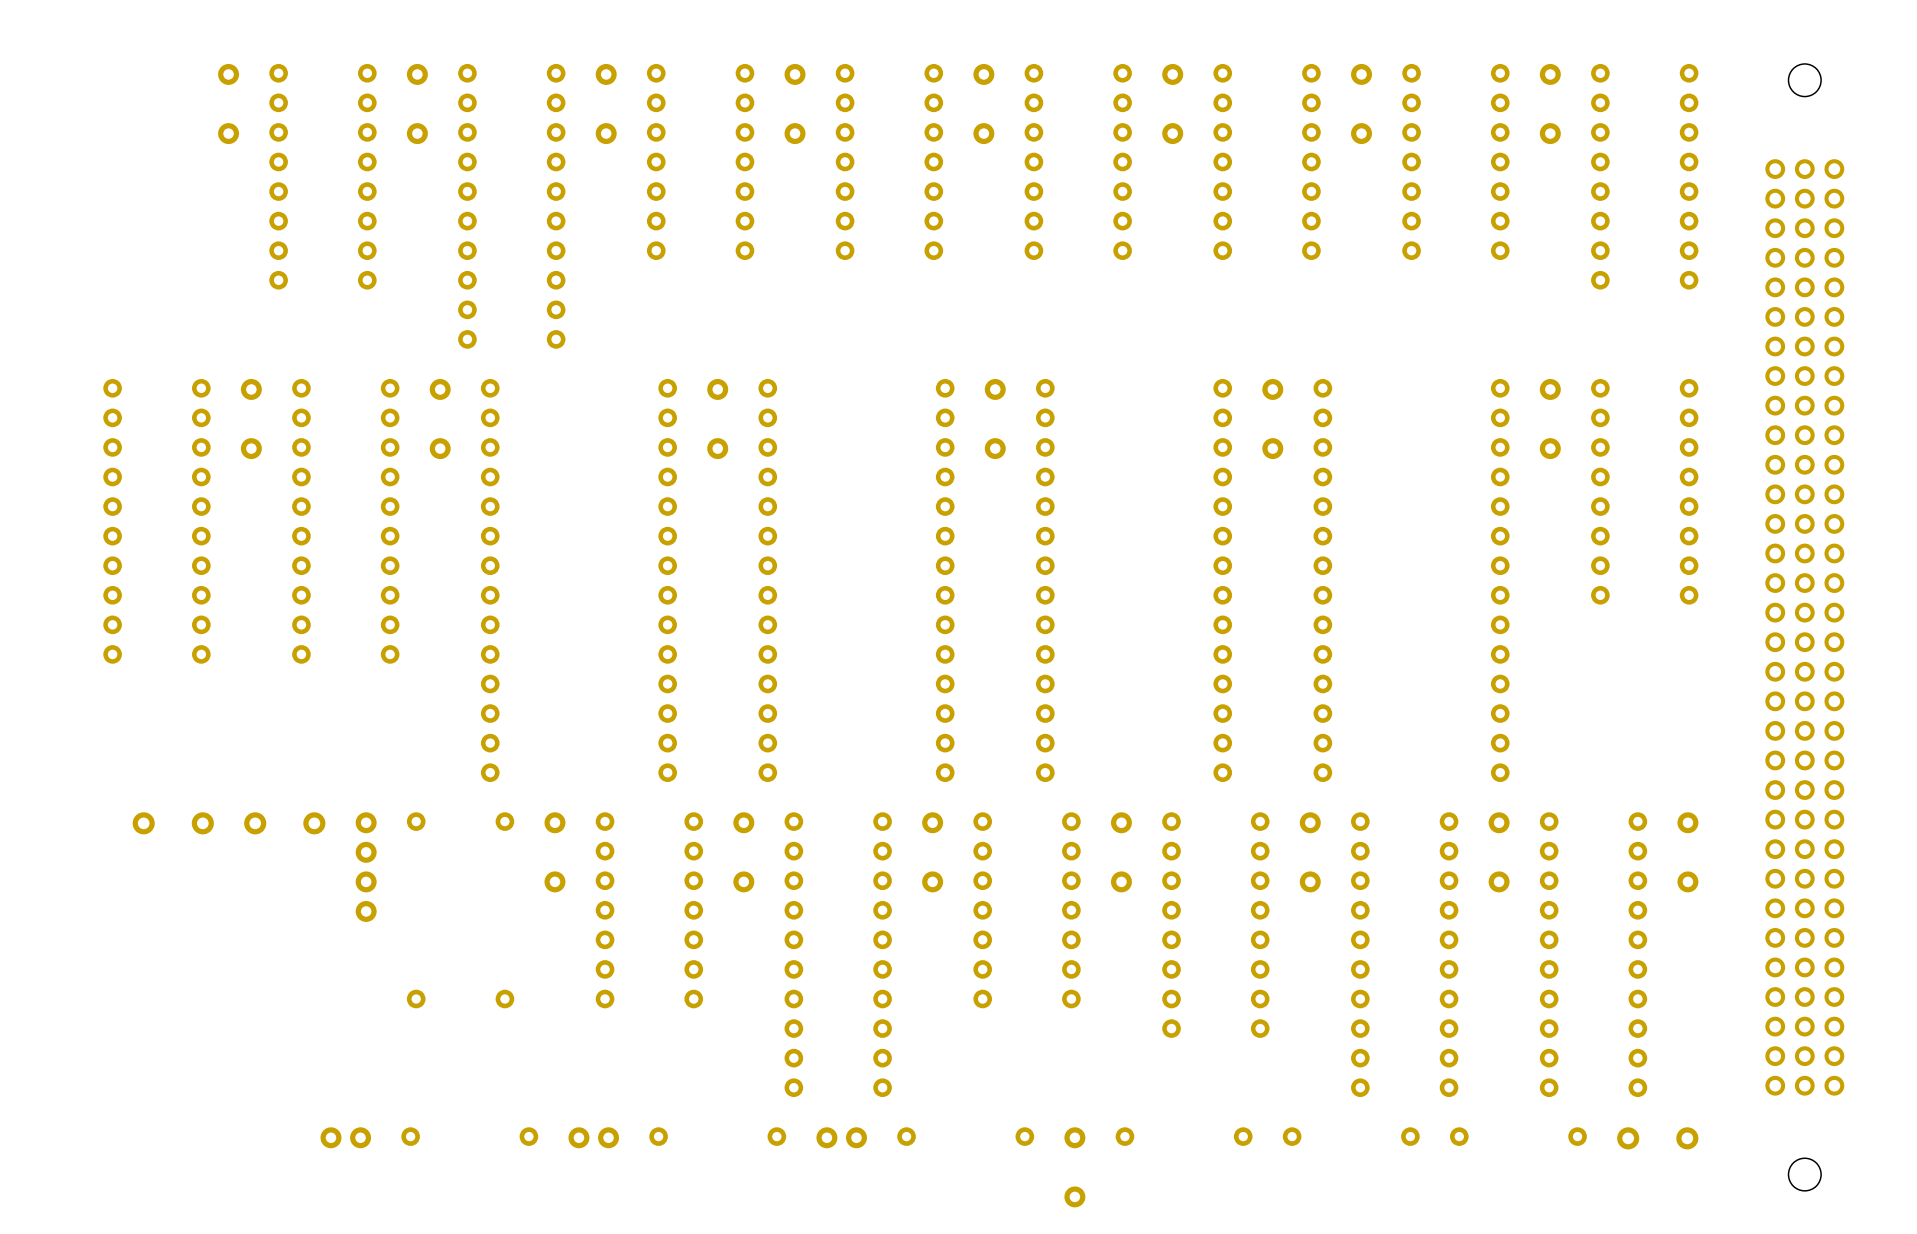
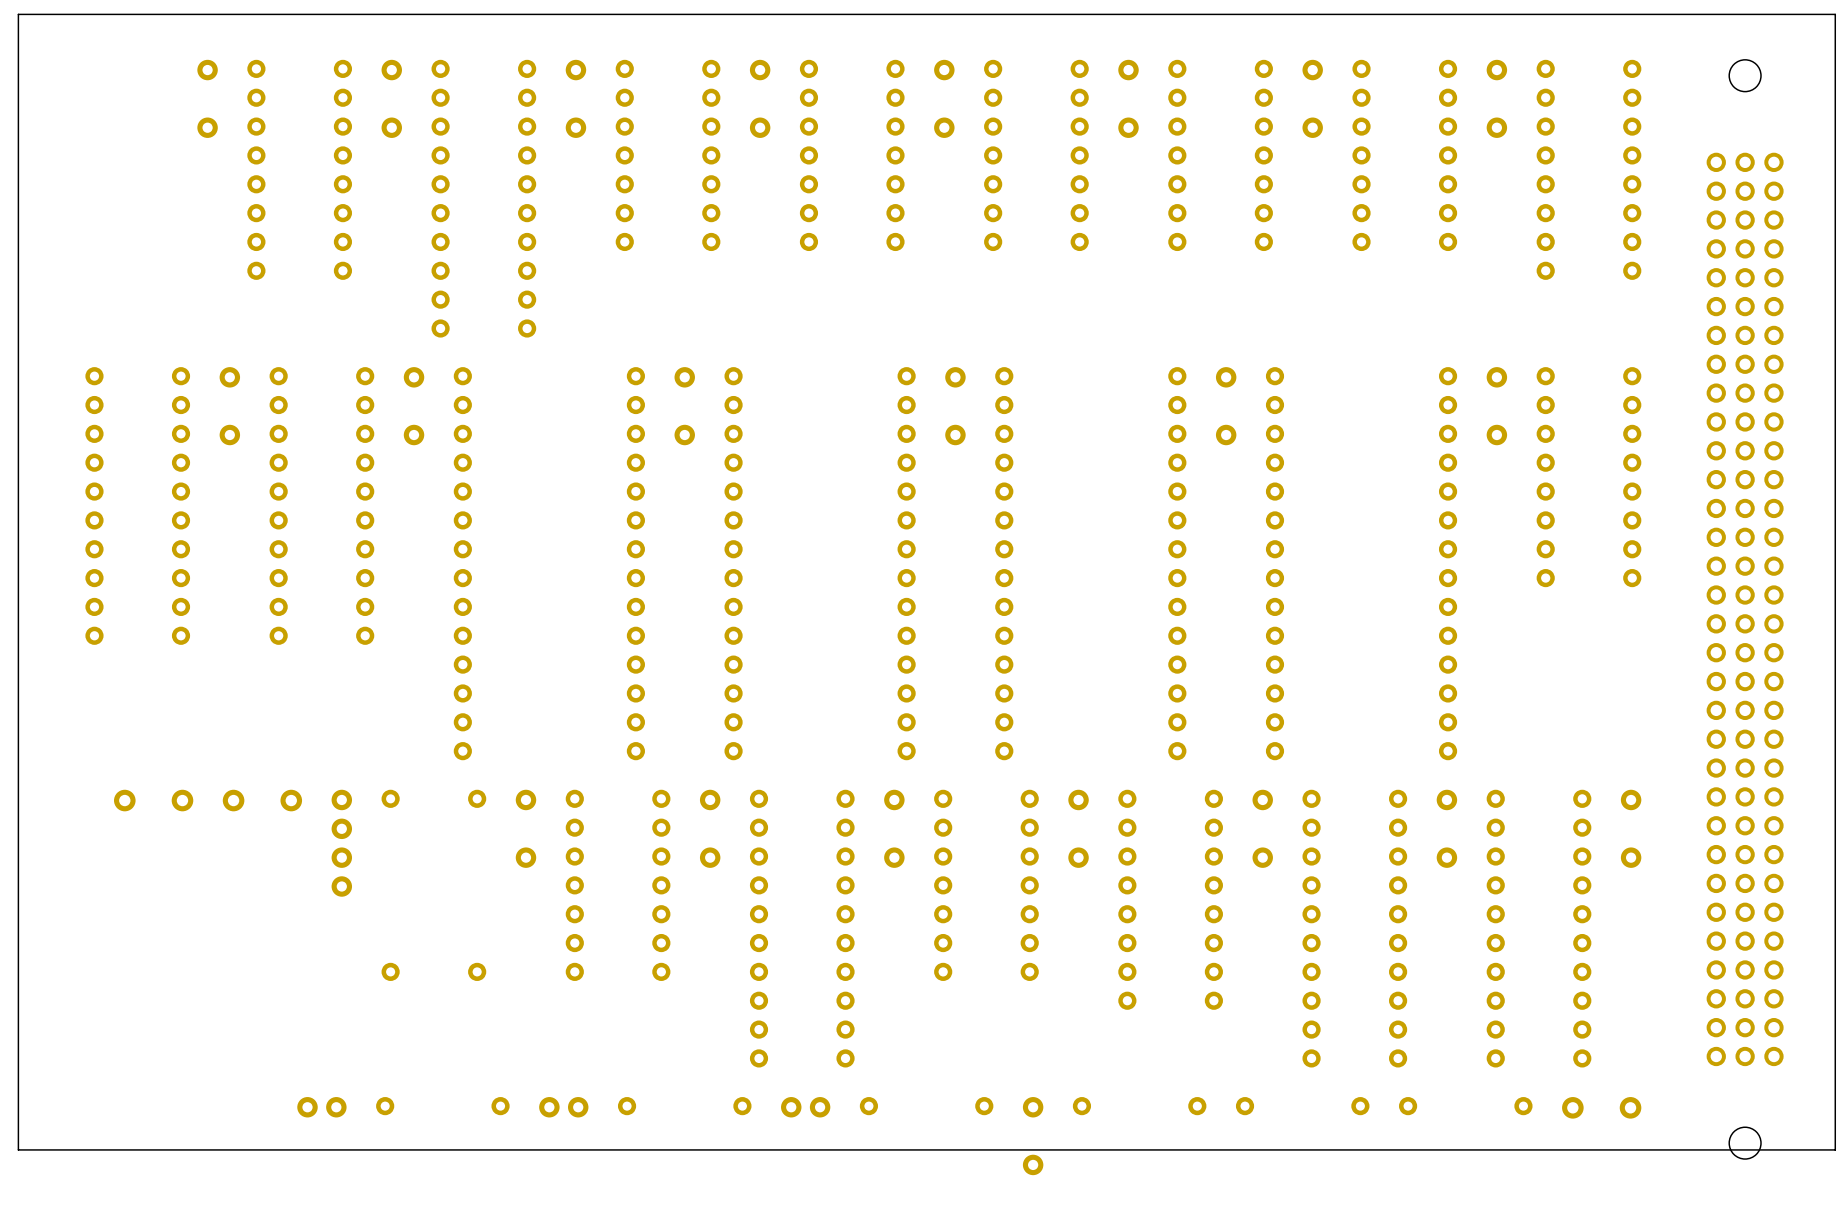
board edge: none -> (1835, 14) (18, 14) (18, 1149) (1835, 1149) (1835, 14)

